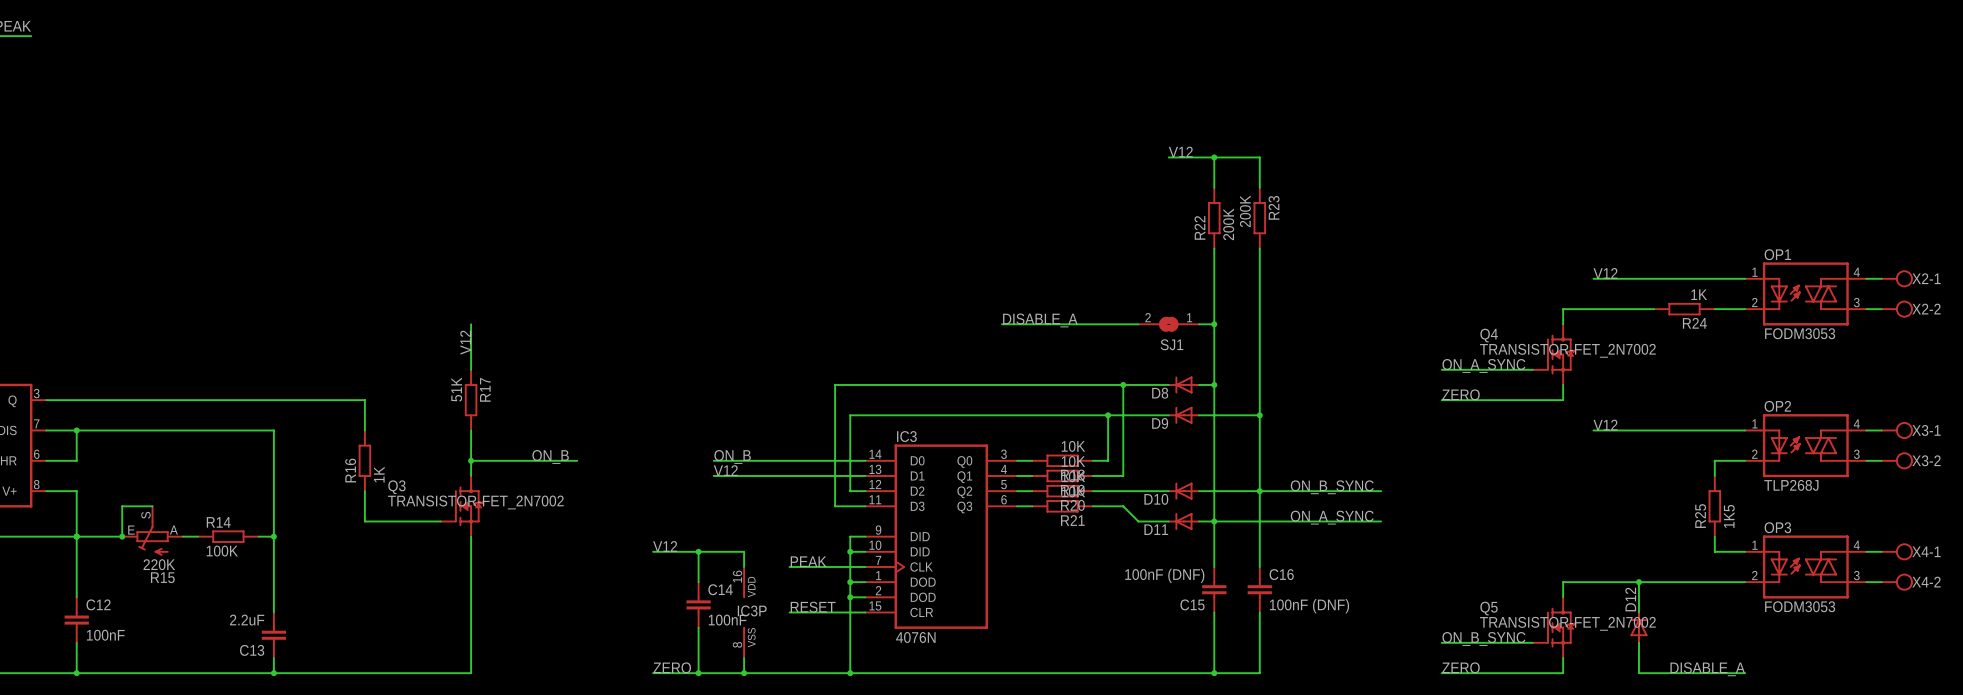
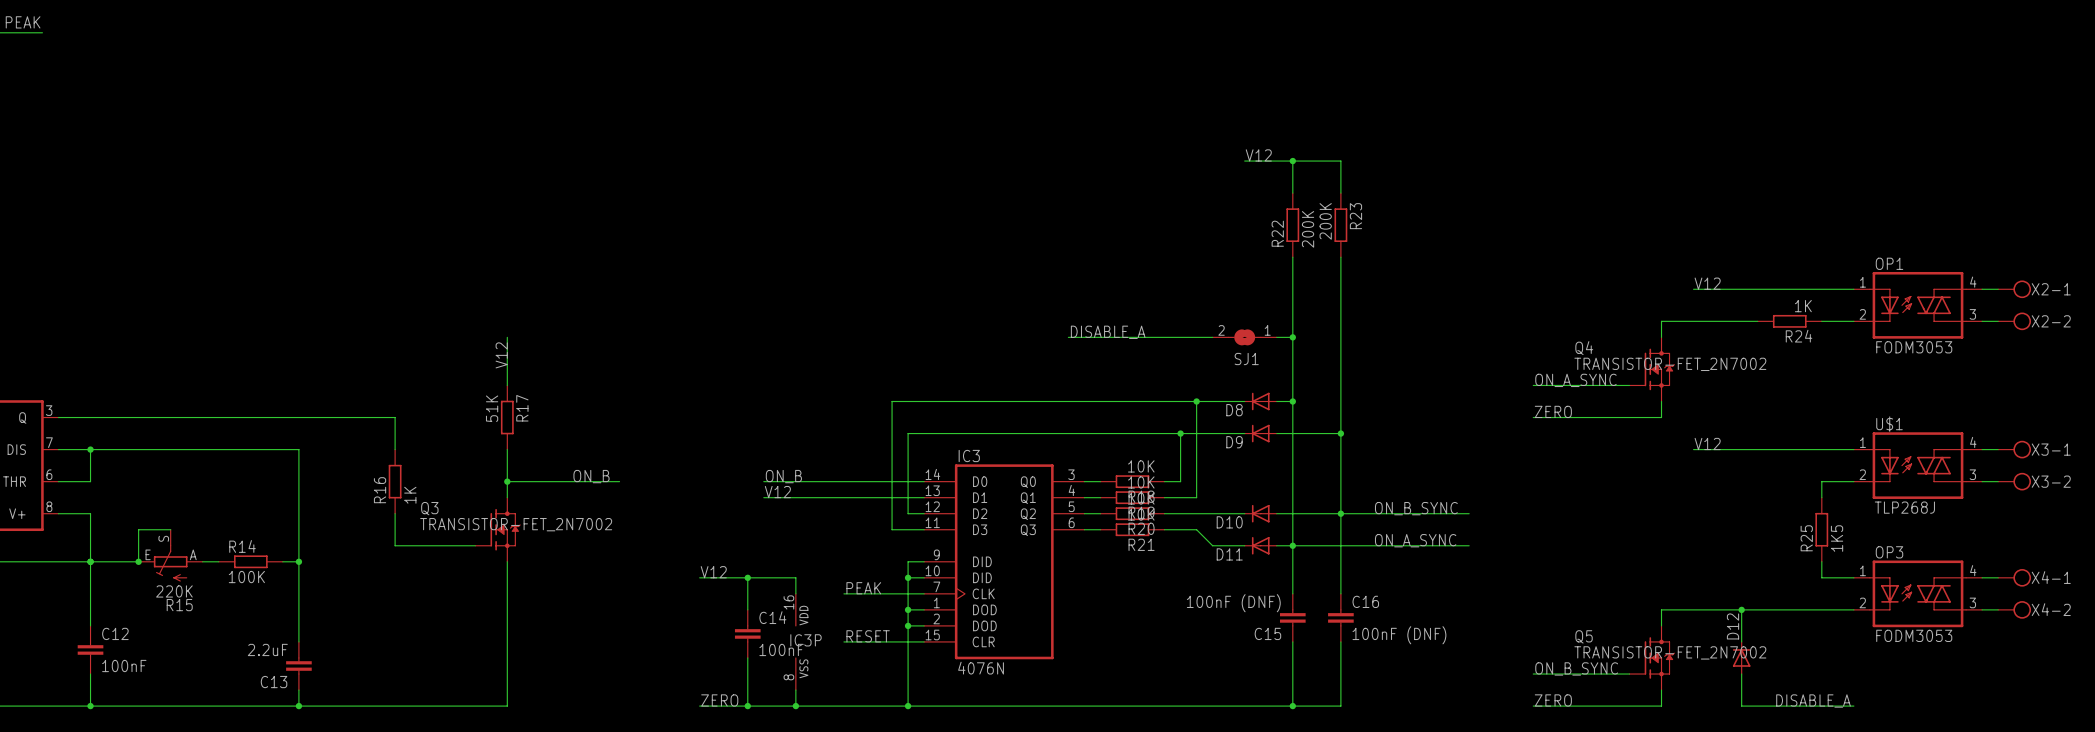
OP2 name: OP2 (1777, 406) -> U$1 (1889, 424)

